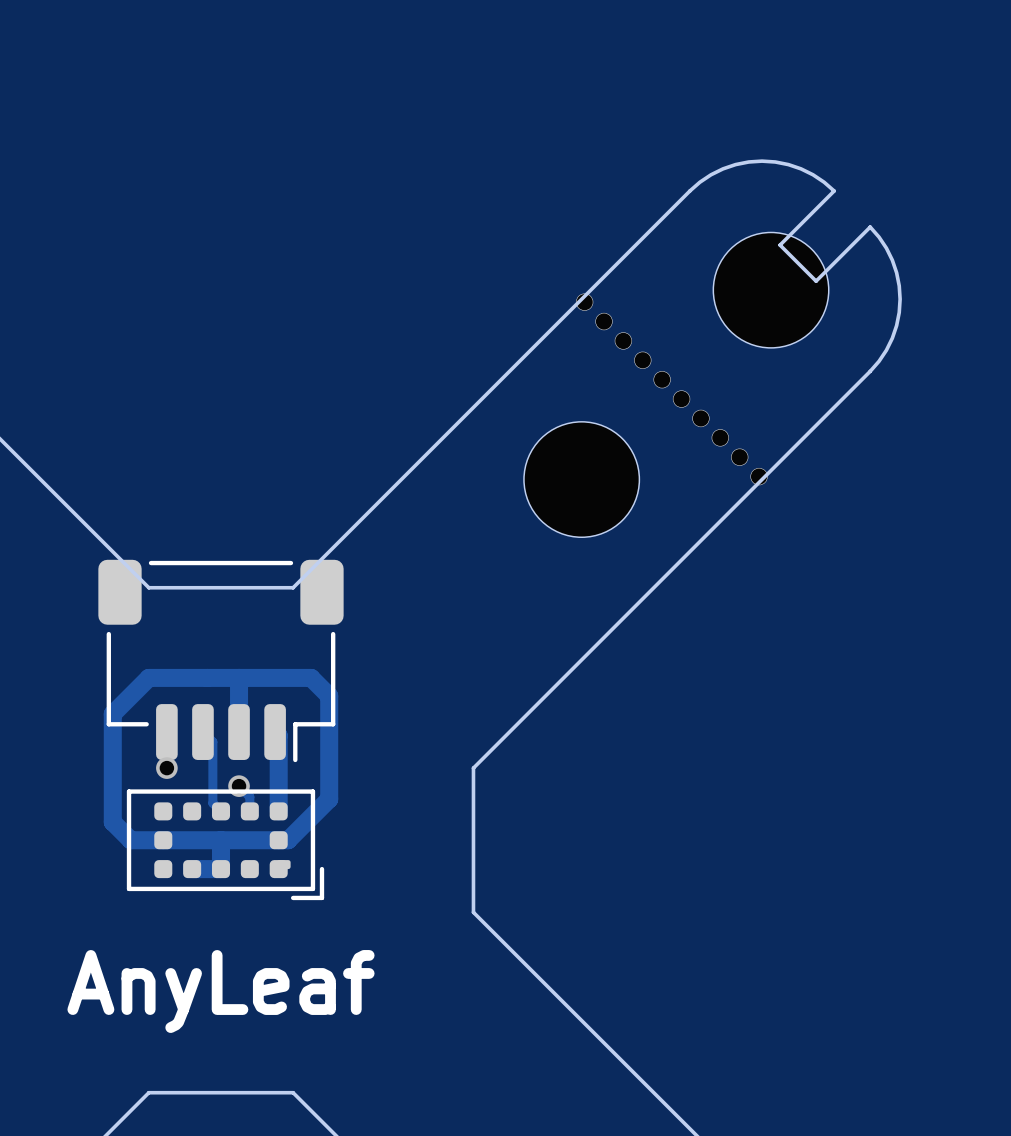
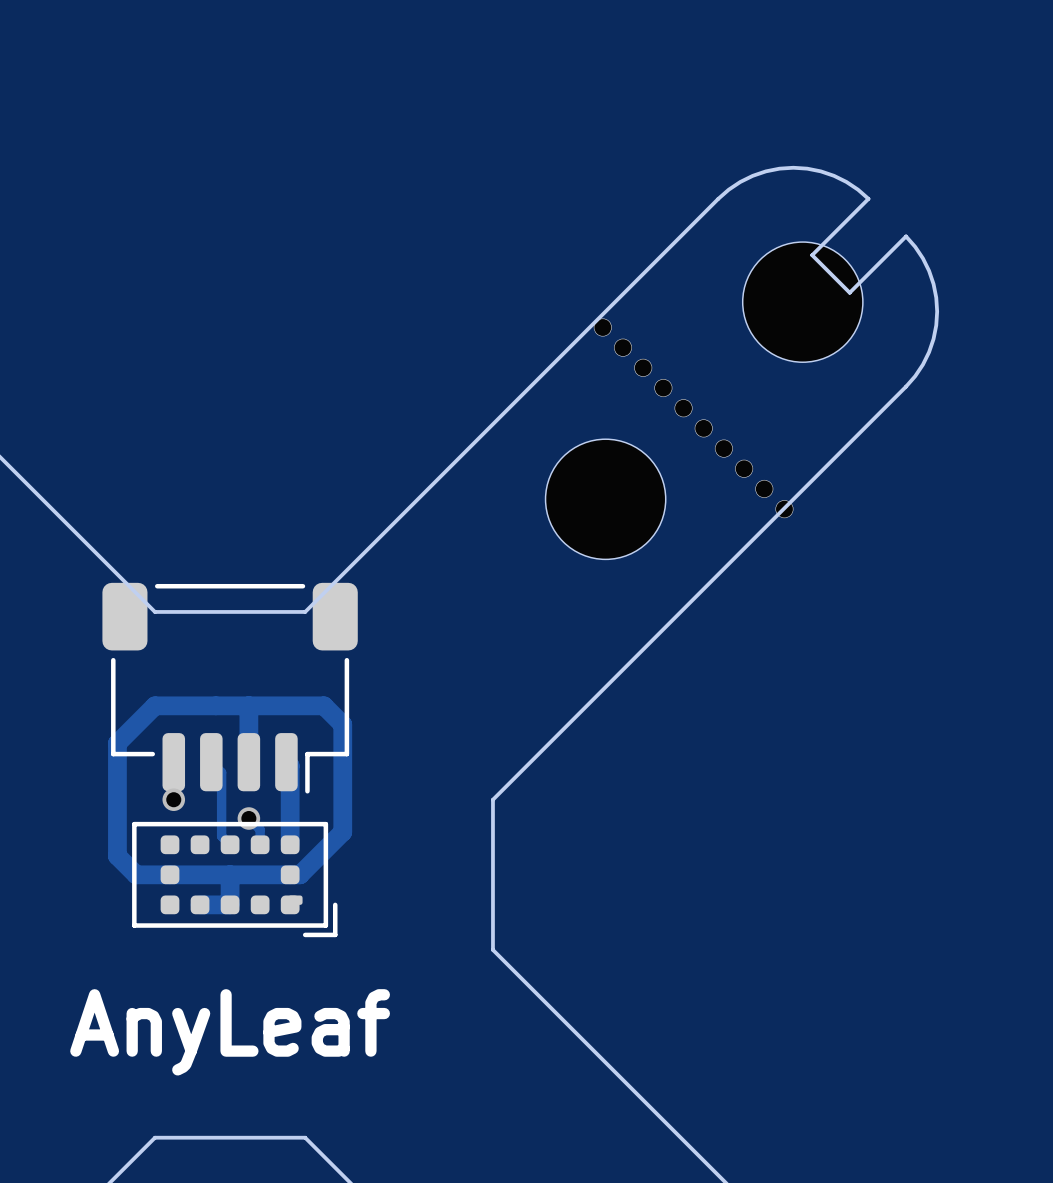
part position: (671, 389) -> (693, 418)

